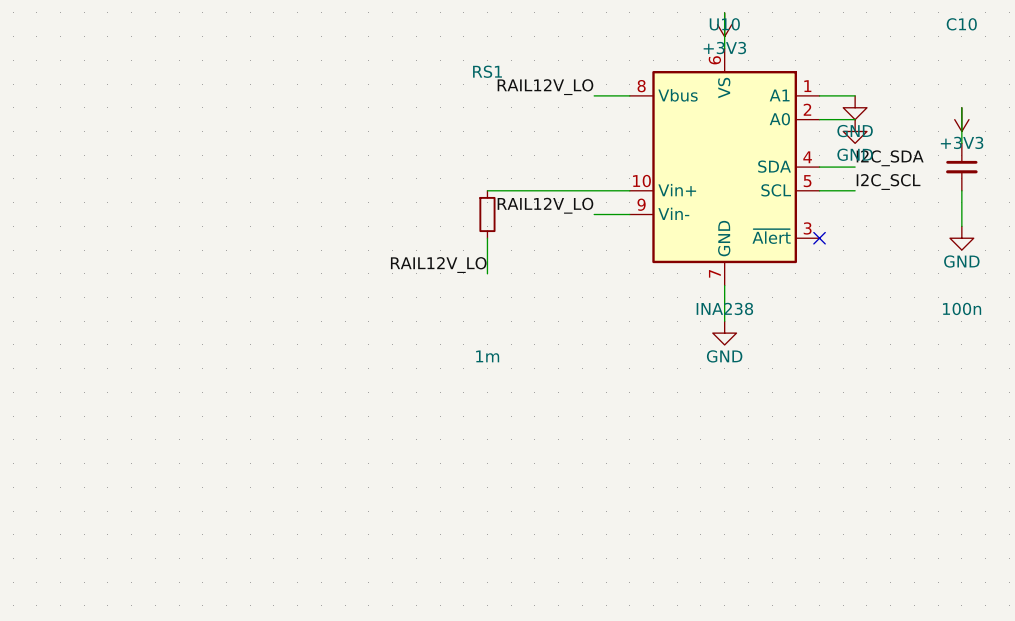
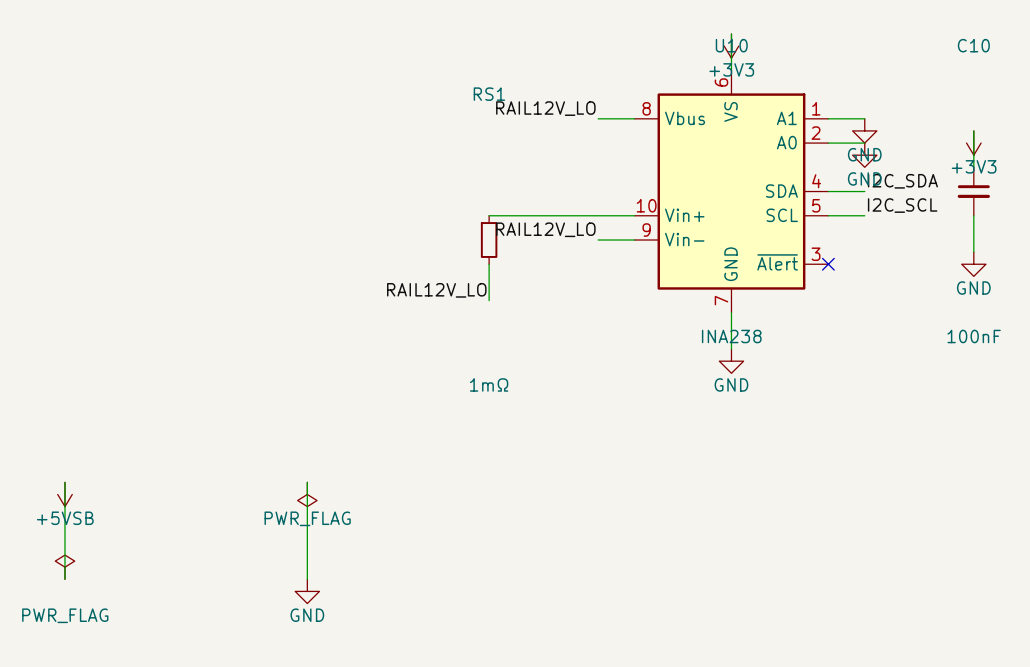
C10 value: 100n (962, 308) -> 100nF (974, 336)
RS1 value: 1m (487, 356) -> 1mΩ (489, 384)
wire: none -> (64, 482) (64, 579)
wire: none -> (307, 482) (307, 579)
power symbol: none -> +5VSB (64, 494)
power symbol: none -> PWR_FLAG (307, 494)
power symbol: none -> PWR_FLAG (64, 567)
power symbol: none -> GND (307, 591)

